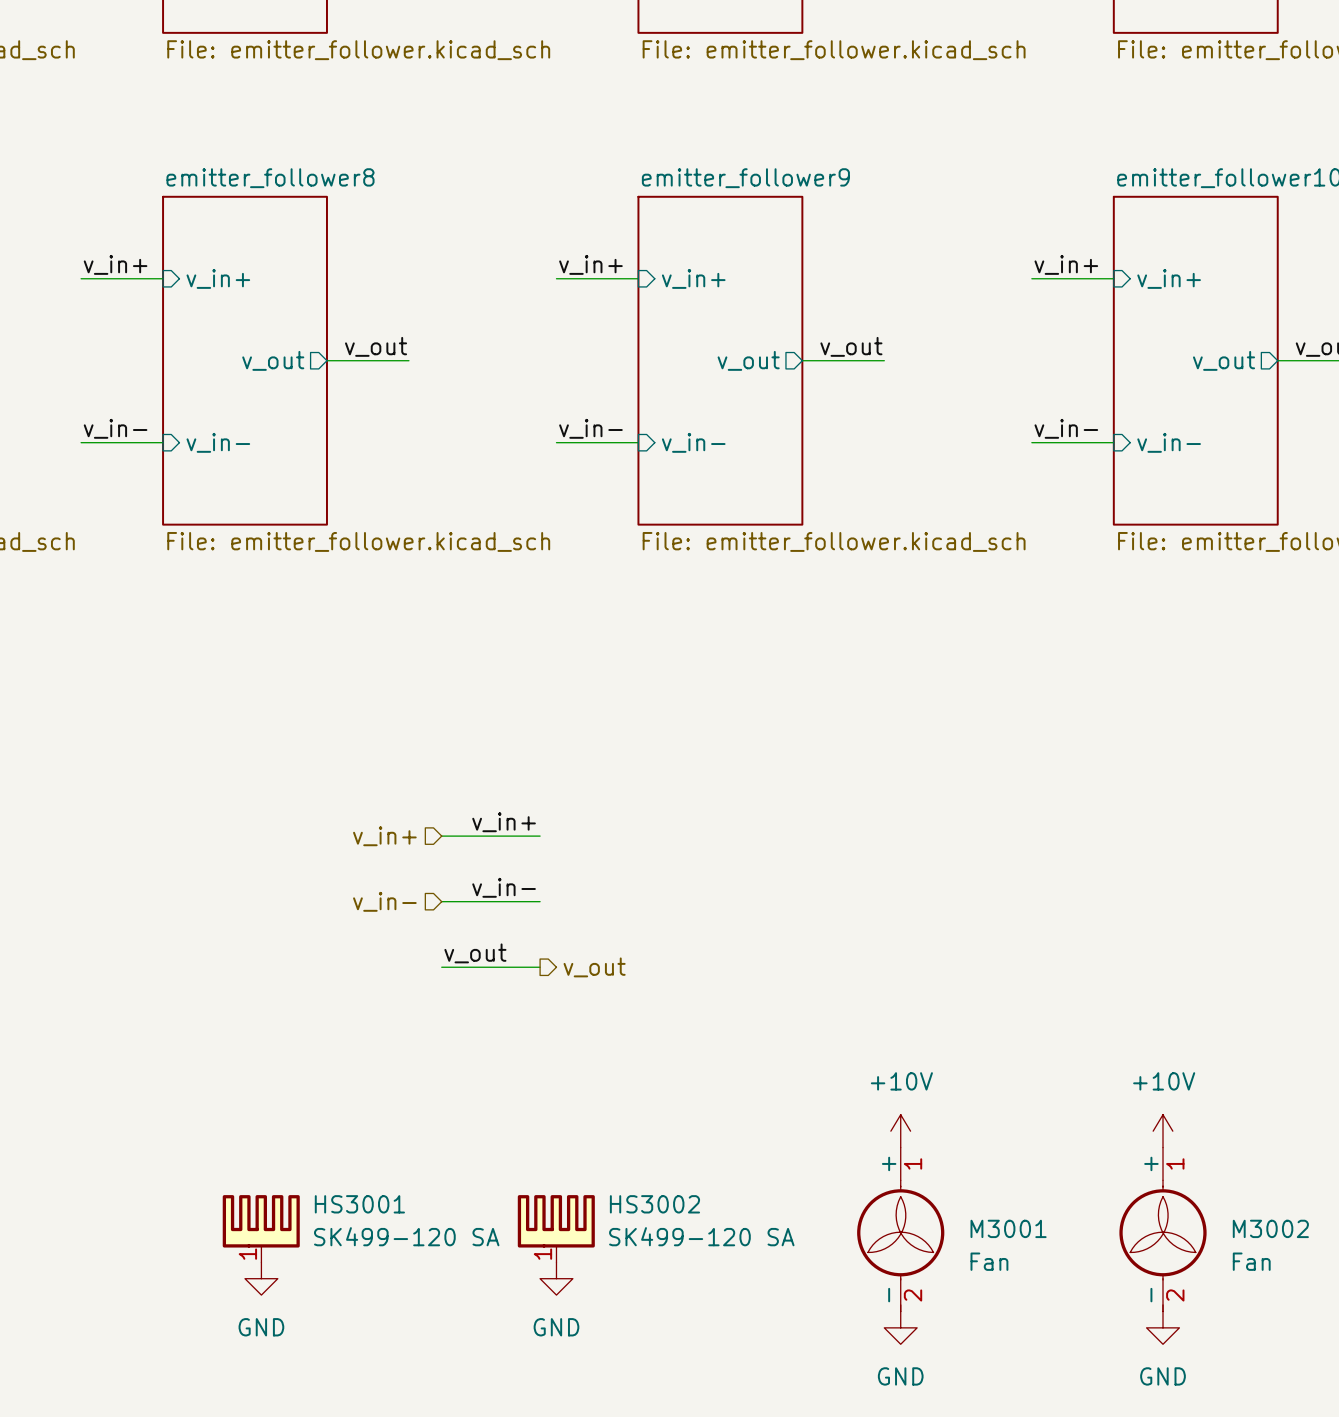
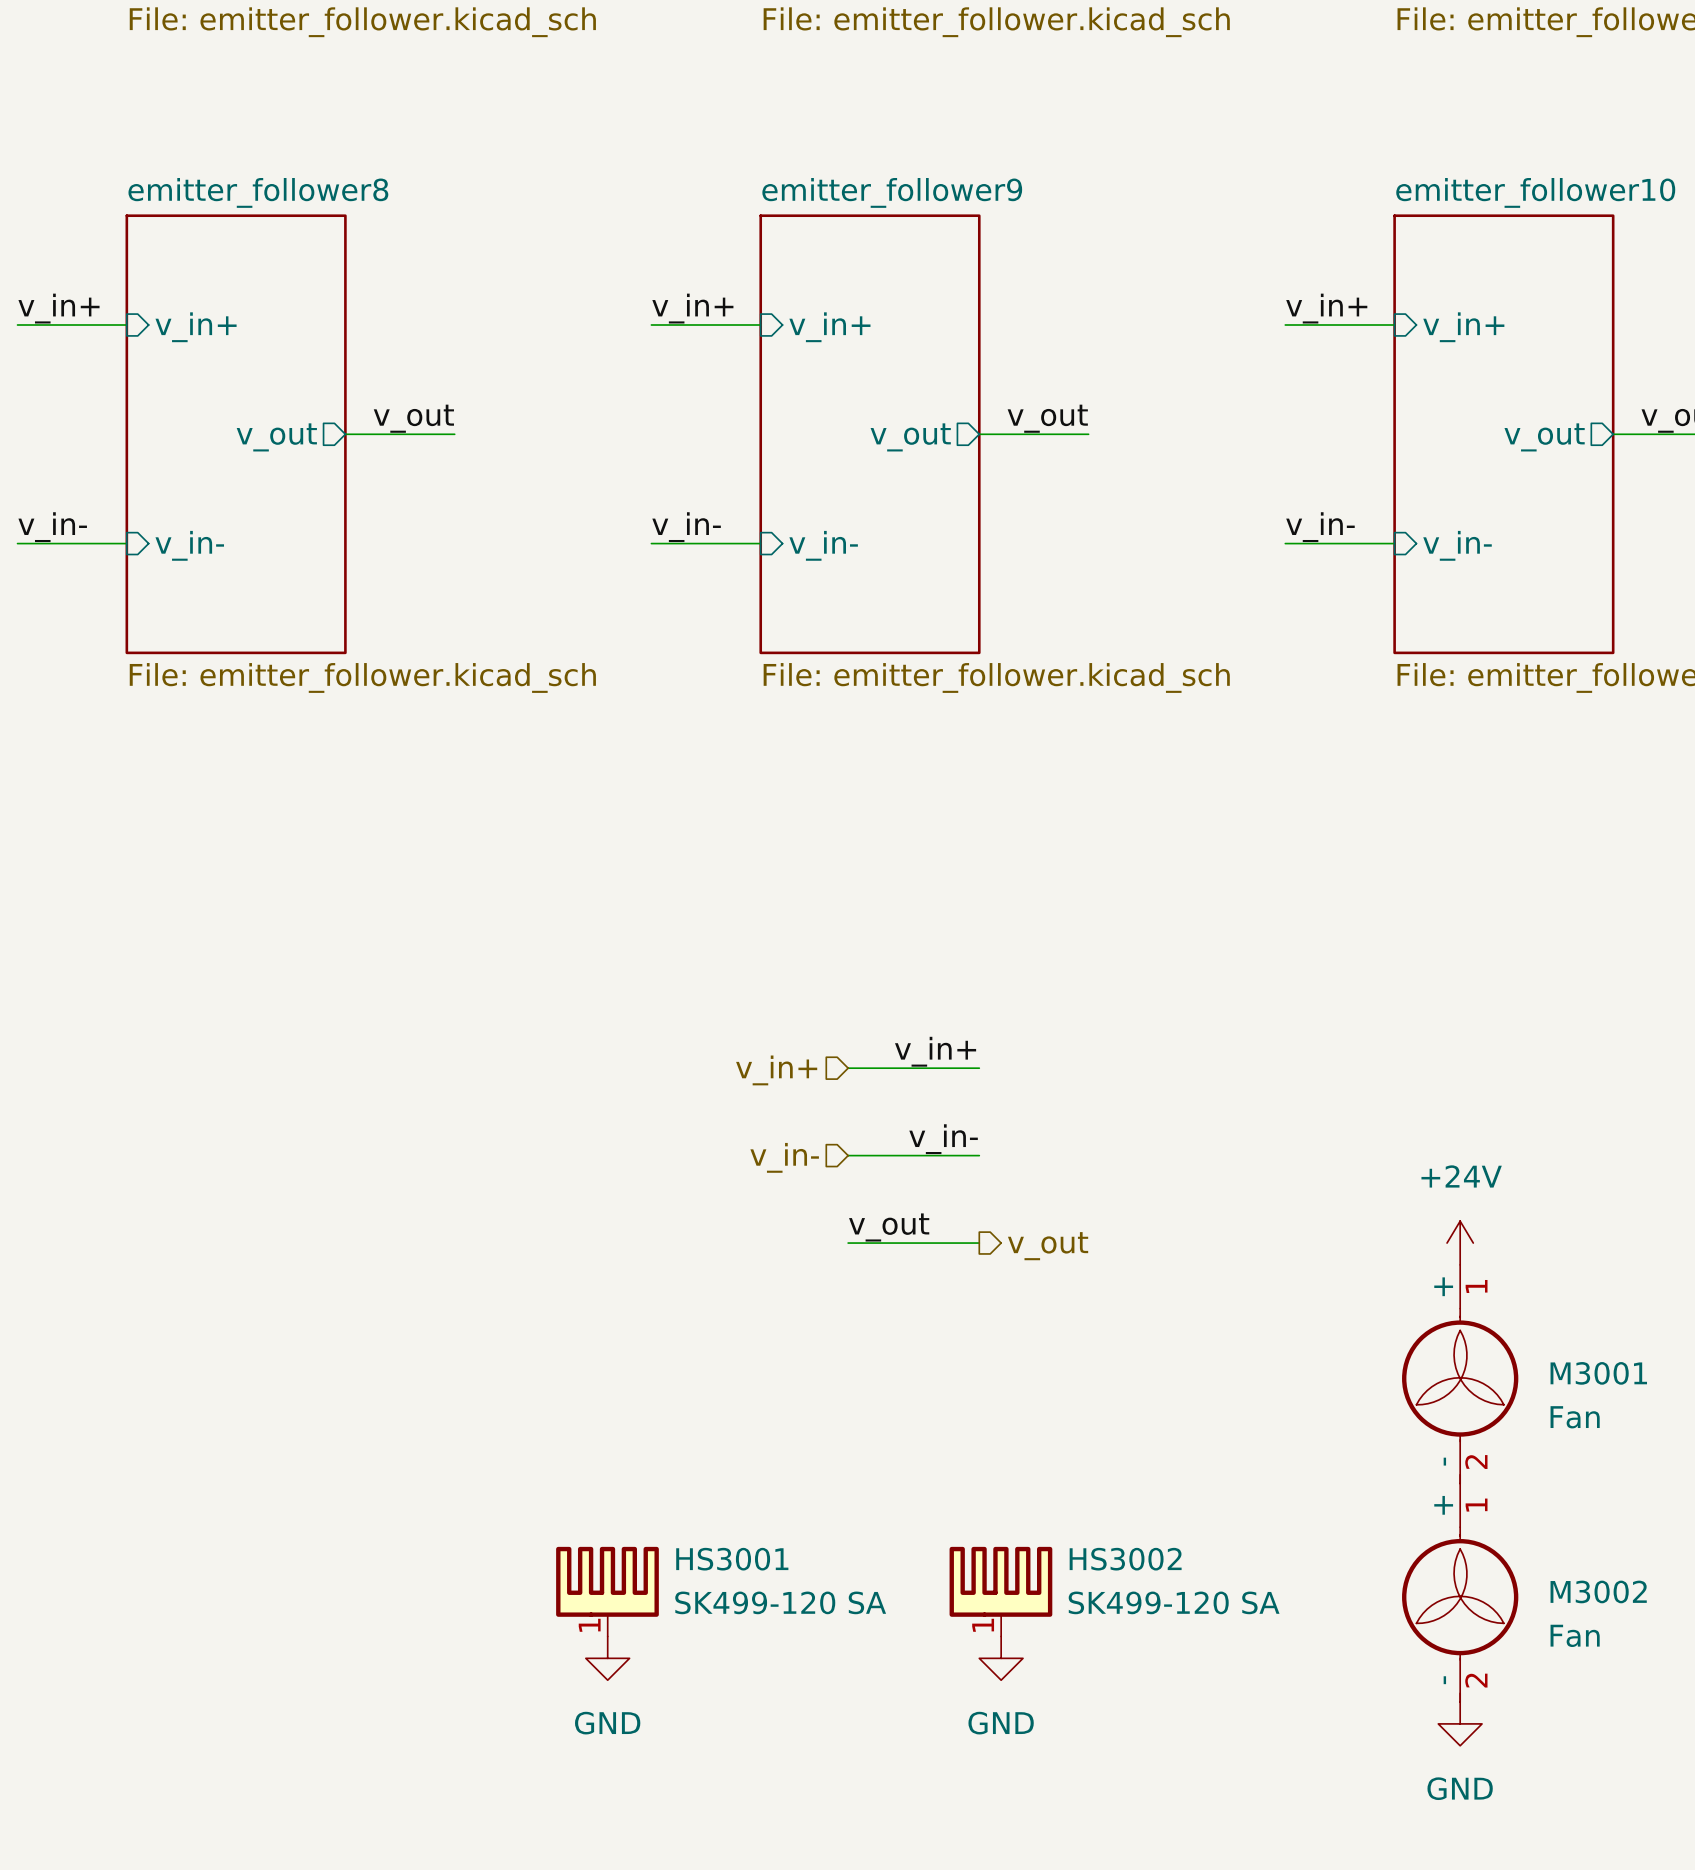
label position: v_in+ (504, 822) -> v_in+ (935, 1051)
hierarchical label position: v_in+ (384, 836) -> v_in+ (776, 1070)
wire: (441, 836) (540, 836) -> (848, 1068) (979, 1068)
label position: v_in- (504, 887) -> v_in- (943, 1139)
hierarchical label position: v_in- (384, 901) -> v_in- (784, 1157)
wire: (441, 901) (540, 901) -> (848, 1155) (979, 1155)
label position: v_out (475, 953) -> v_out (889, 1227)
wire: (441, 967) (540, 967) -> (848, 1243) (979, 1243)
hierarchical label position: v_out (594, 967) -> v_out (1048, 1246)
power symbol: none -> +24V (1460, 1243)
power symbol: +10V (900, 1131) -> none
power symbol: +10V (1163, 1131) -> none
HS3001 position: (261, 1228) -> (607, 1591)
HS3002 position: (556, 1228) -> (1000, 1591)
M3001 position: (900, 1229) -> (1460, 1374)
power symbol: GND (261, 1278) -> none
power symbol position: GND (556, 1278) -> GND (607, 1658)
power symbol position: GND (900, 1327) -> GND (1001, 1658)

